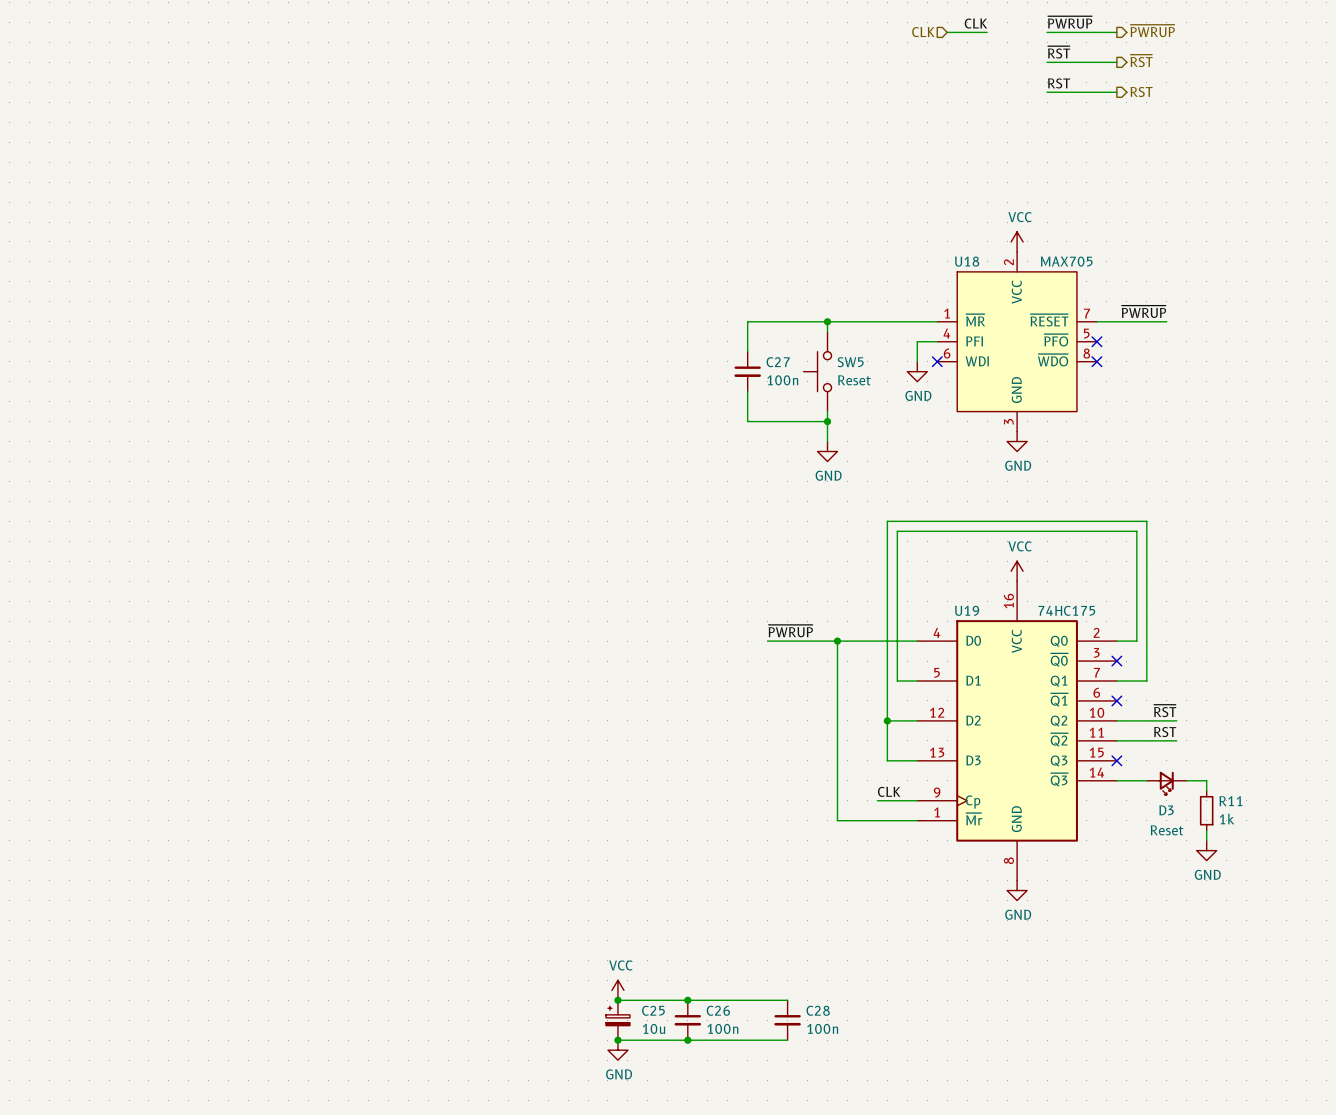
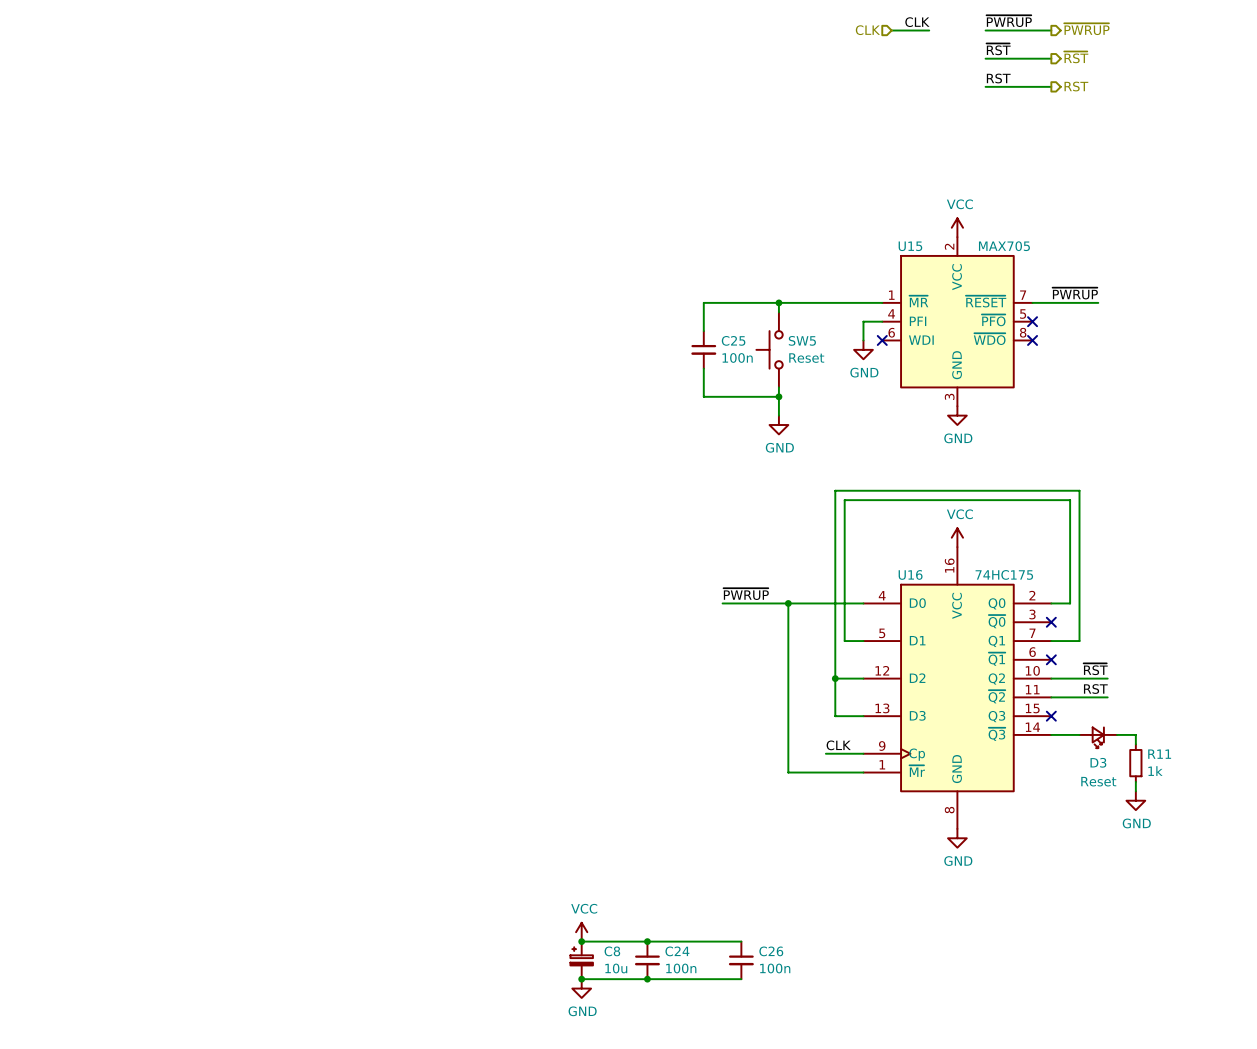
U18 name: U18 (967, 261) -> U15 (910, 246)
C27 name: C27 (778, 362) -> C25 (733, 340)
U19 name: U19 (967, 610) -> U16 (910, 574)
C25 name: C25 (653, 1010) -> C8 (612, 951)
C26 name: C26 (718, 1010) -> C24 (677, 951)
C28 name: C28 (818, 1010) -> C26 (771, 951)

